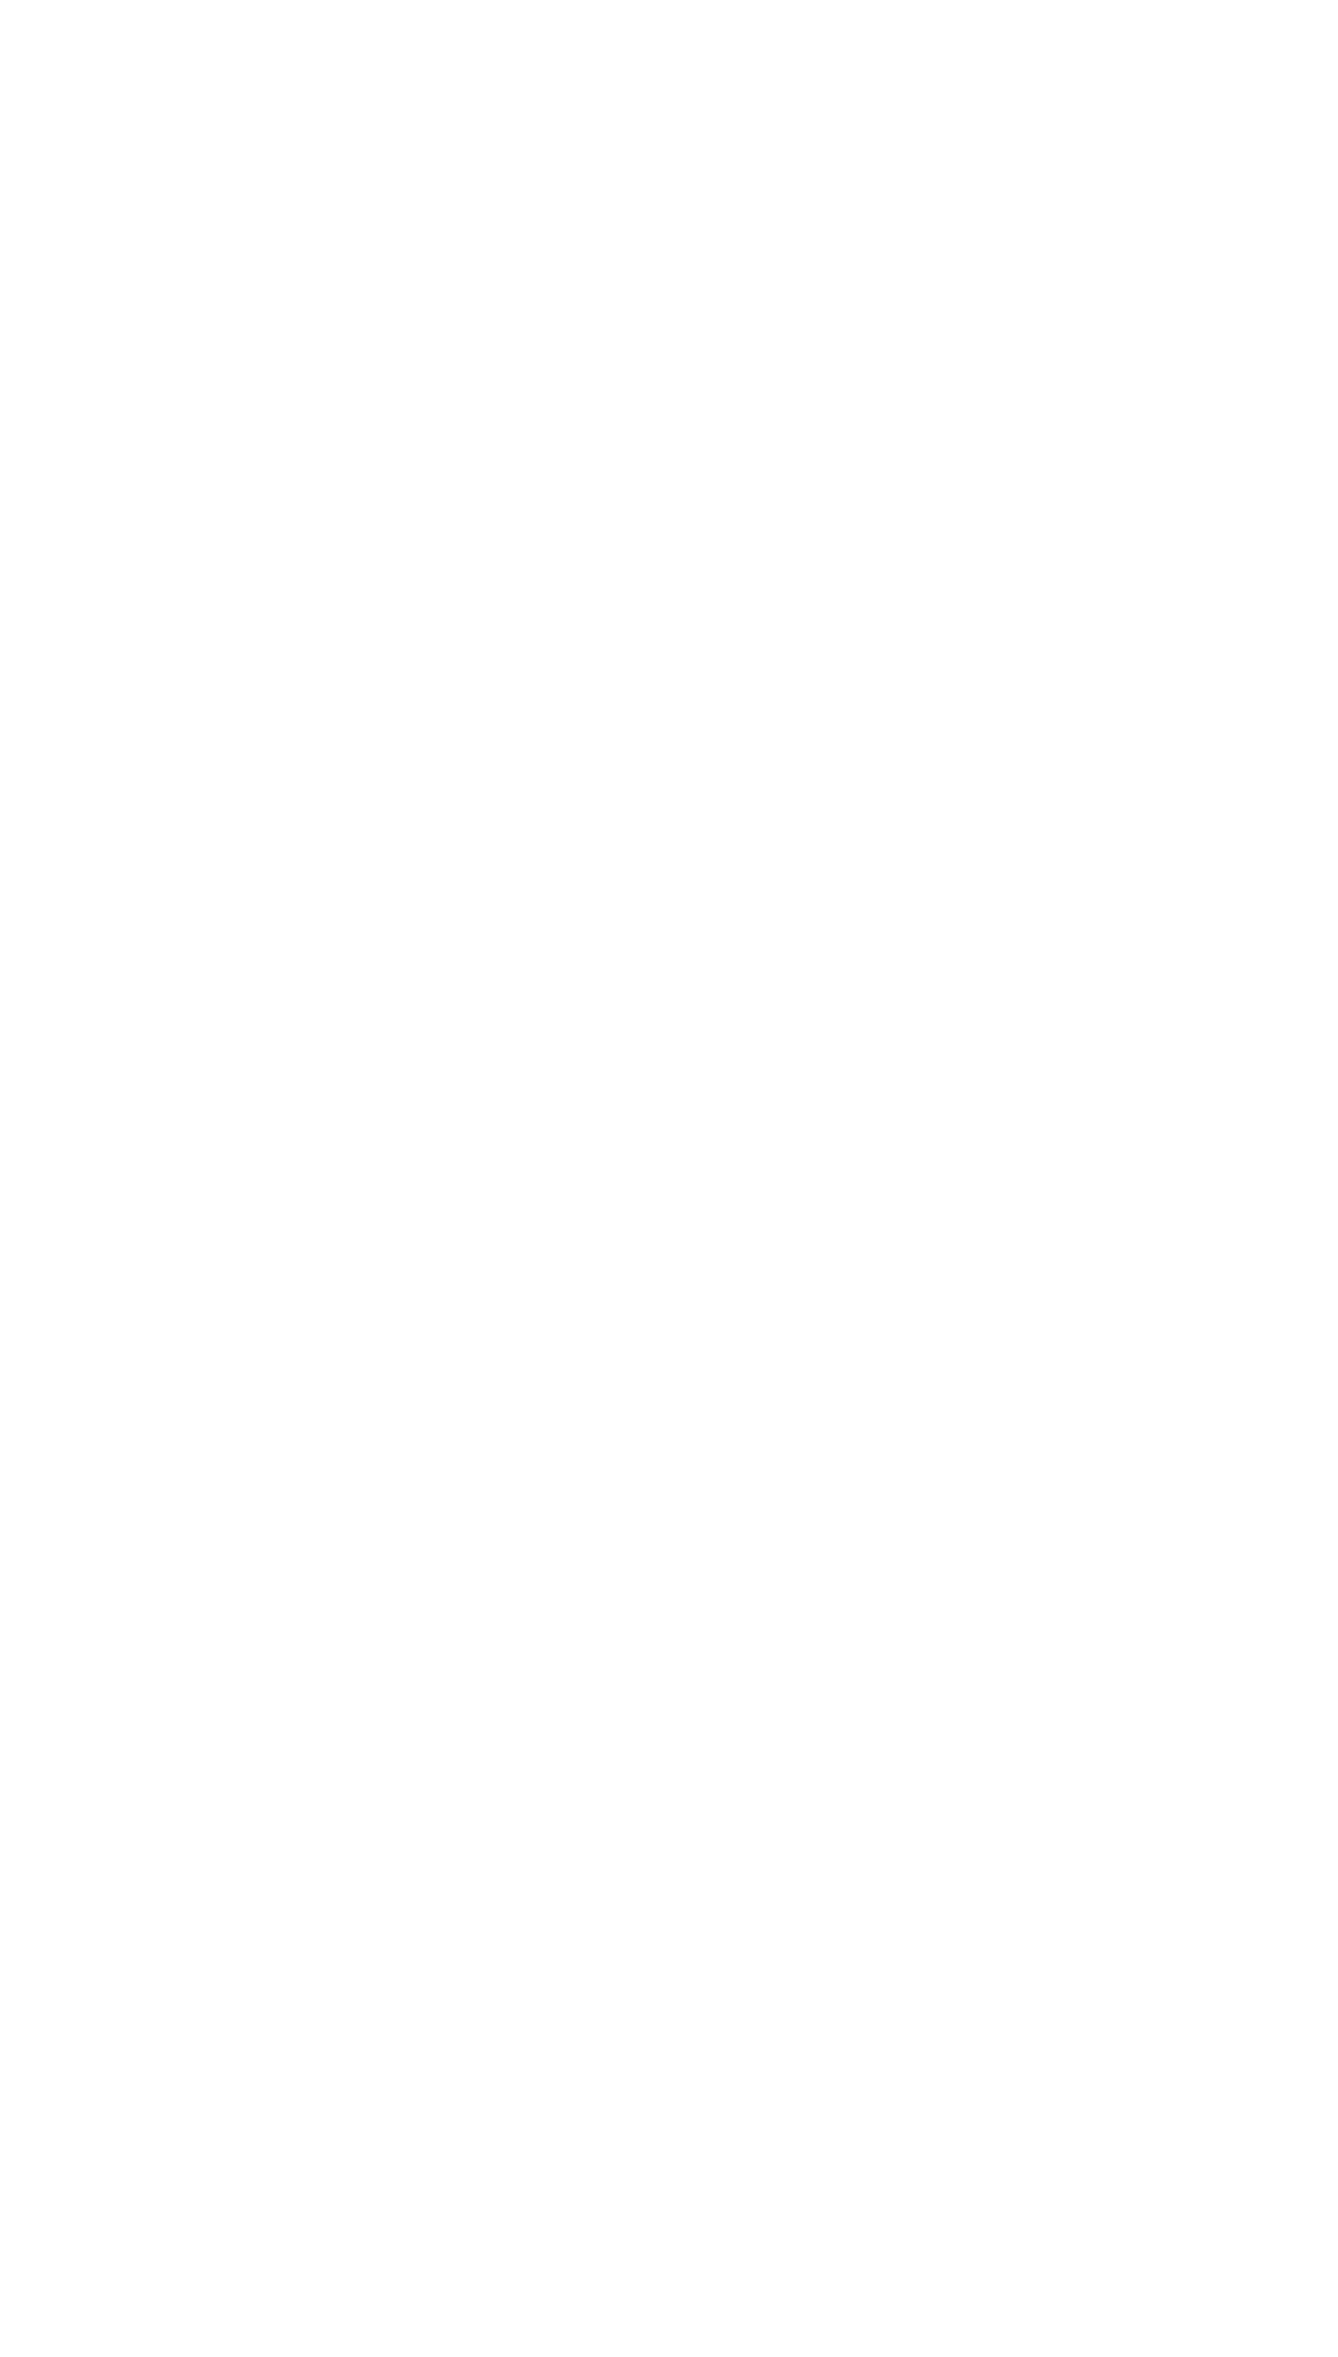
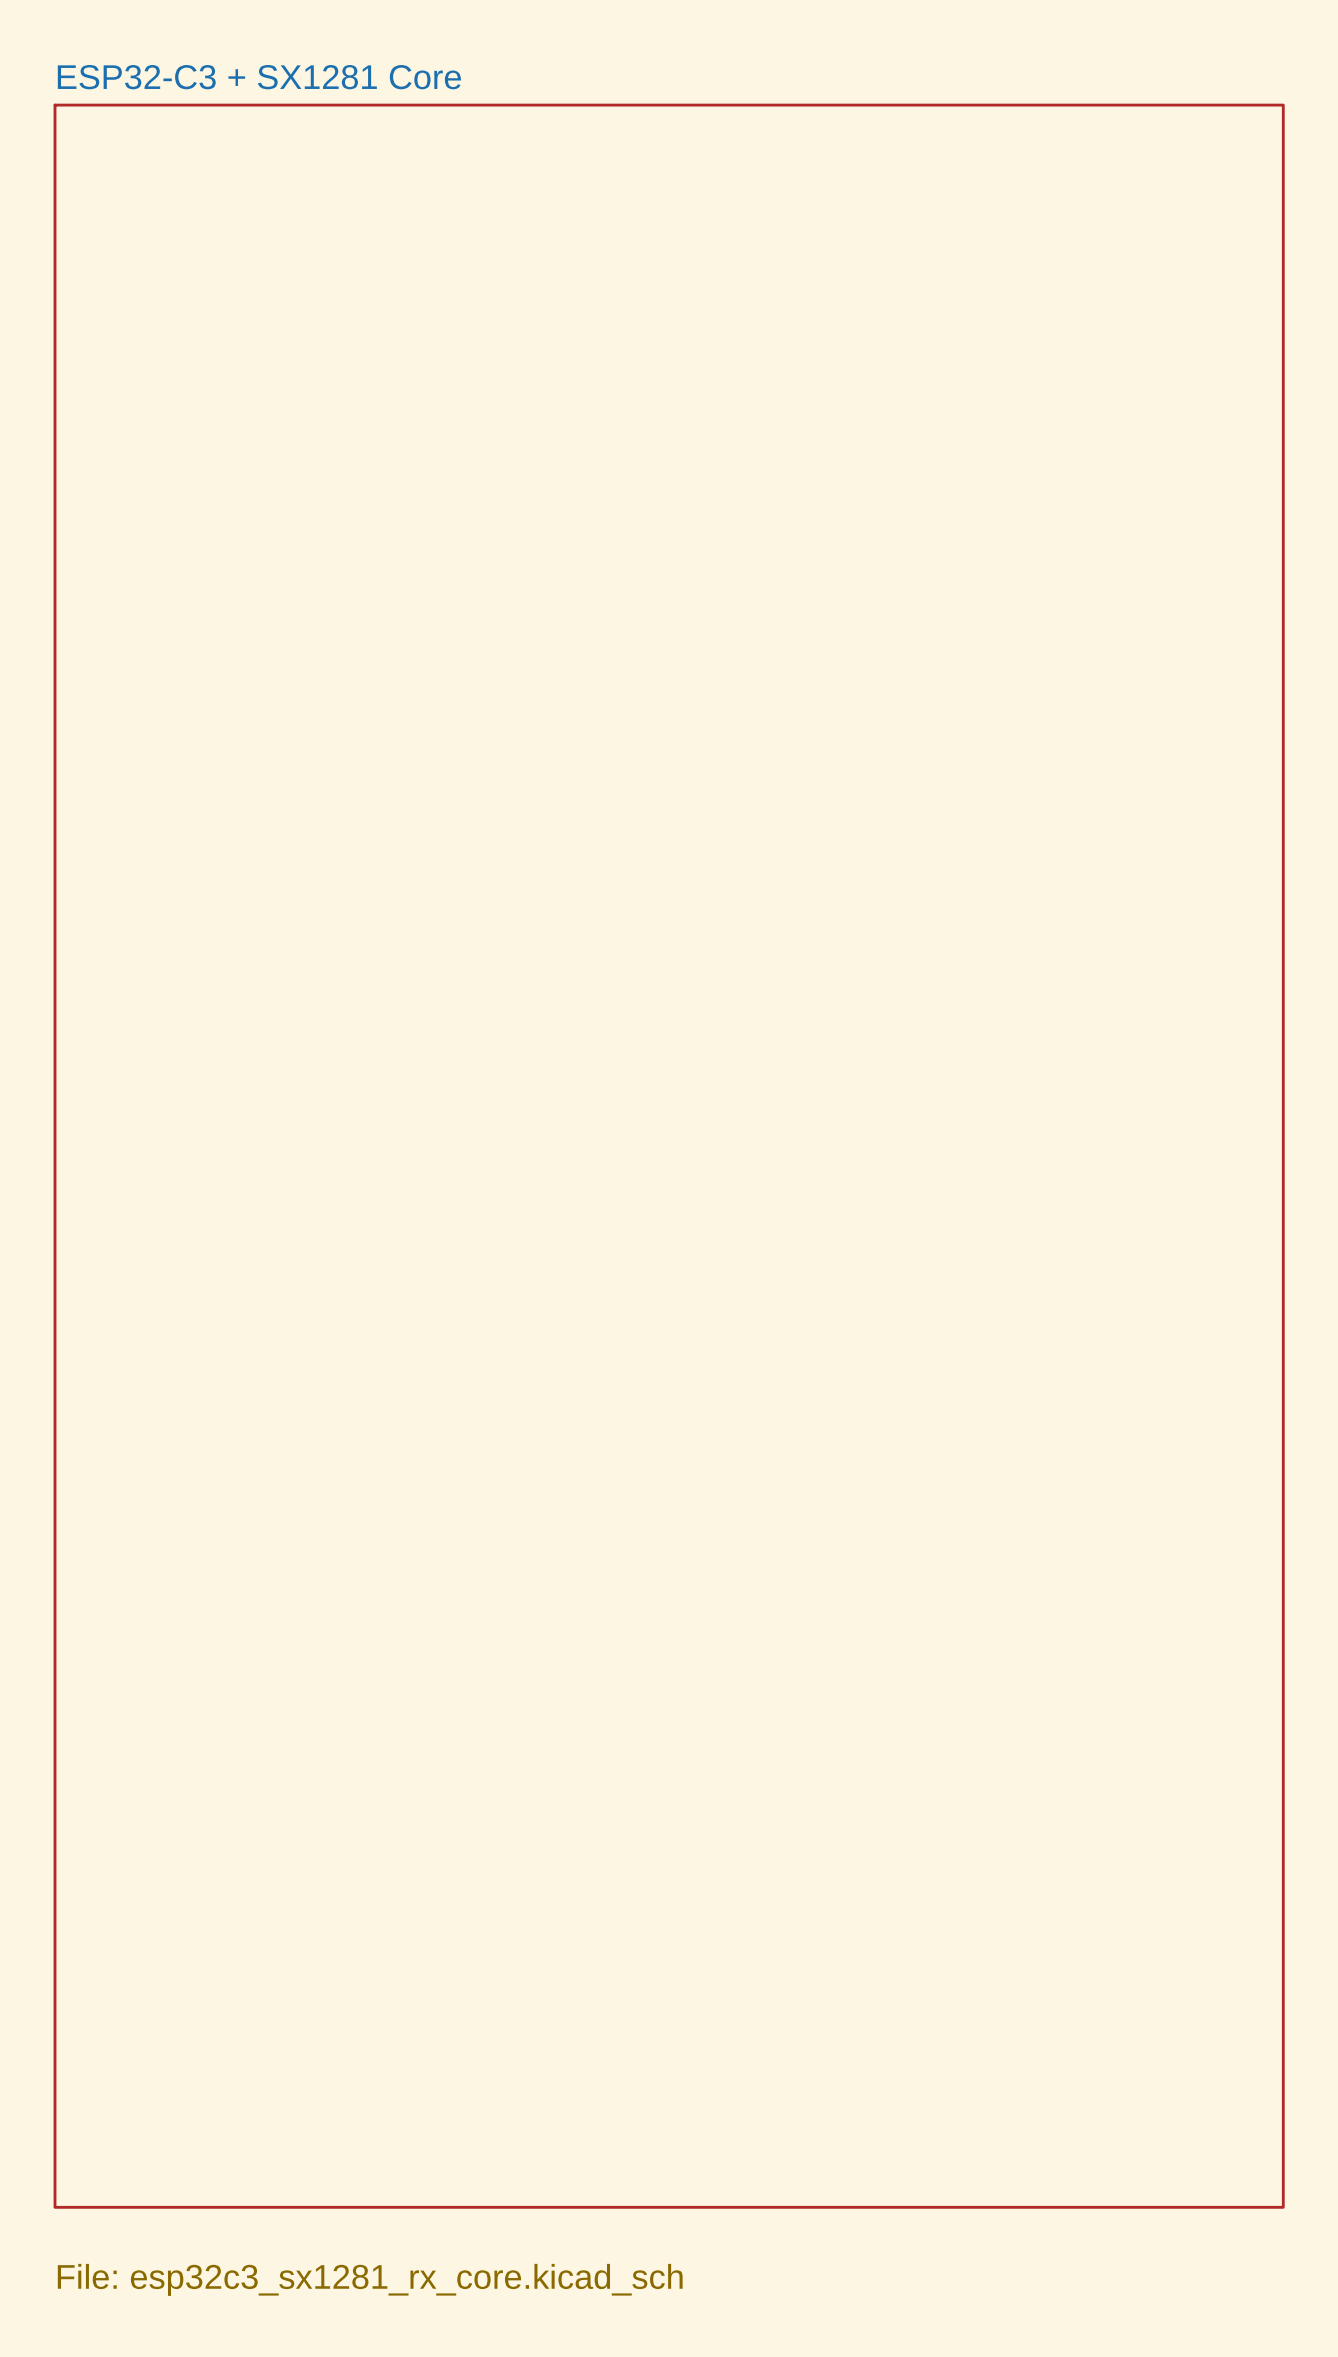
sheet ESP32-C3 + SX1281 Core: none -> File: esp32c3_sx1281_rx_core.kicad_sch (669, 1156)

